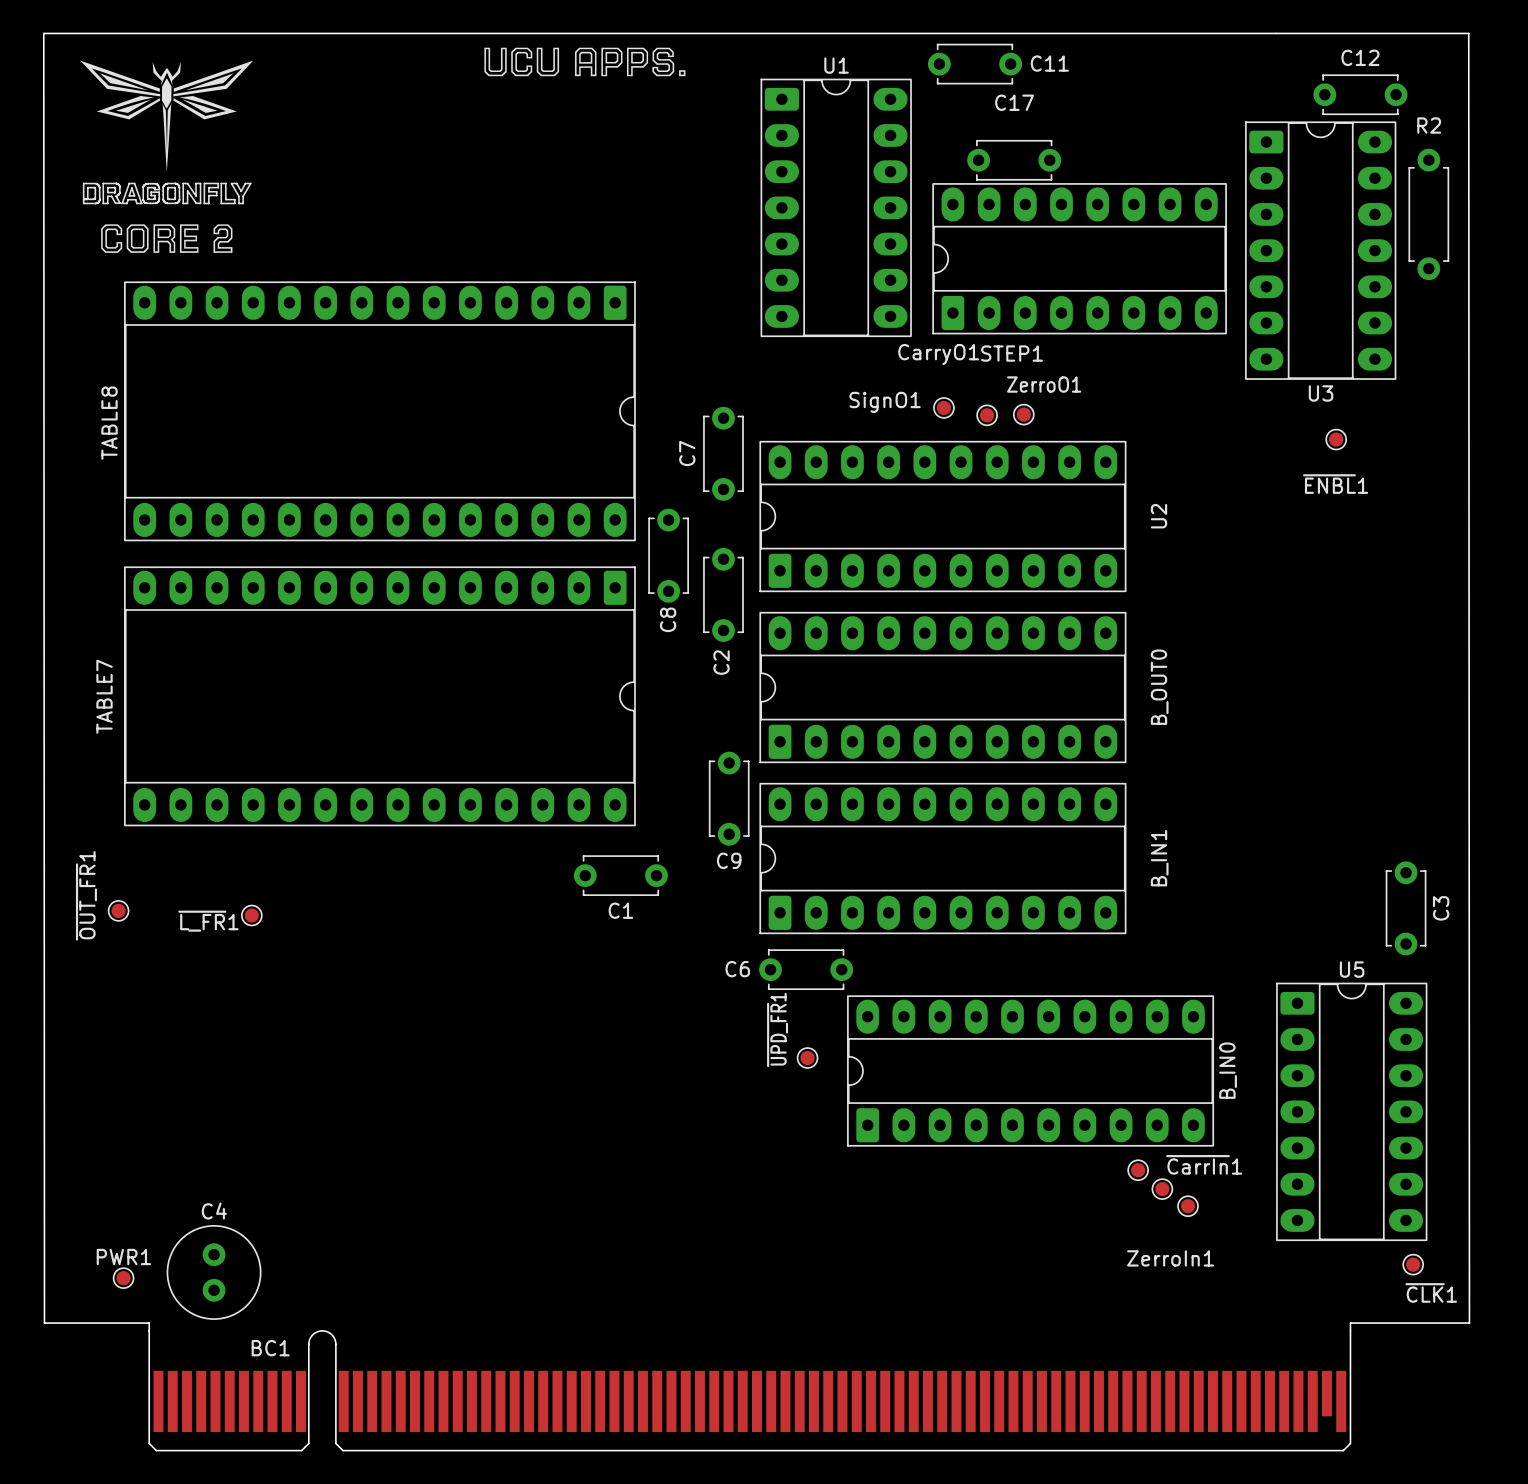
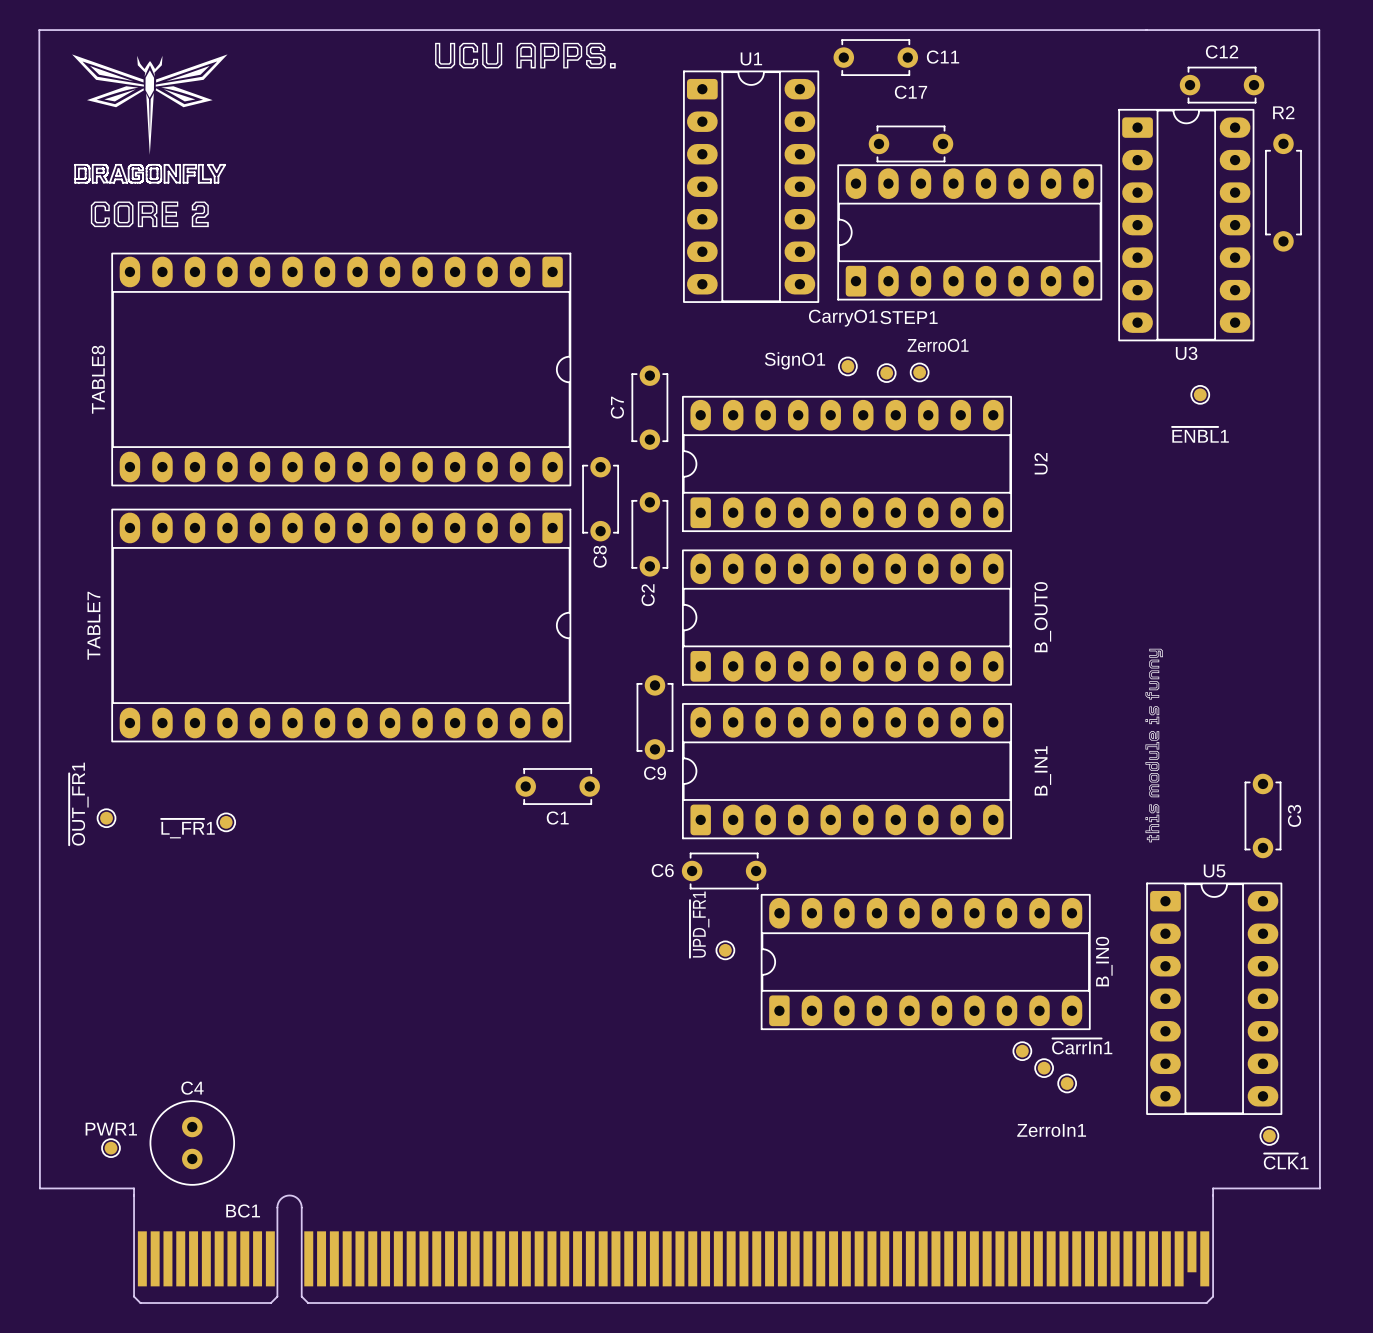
drawing: none -> [1145, 648, 1163, 843]

